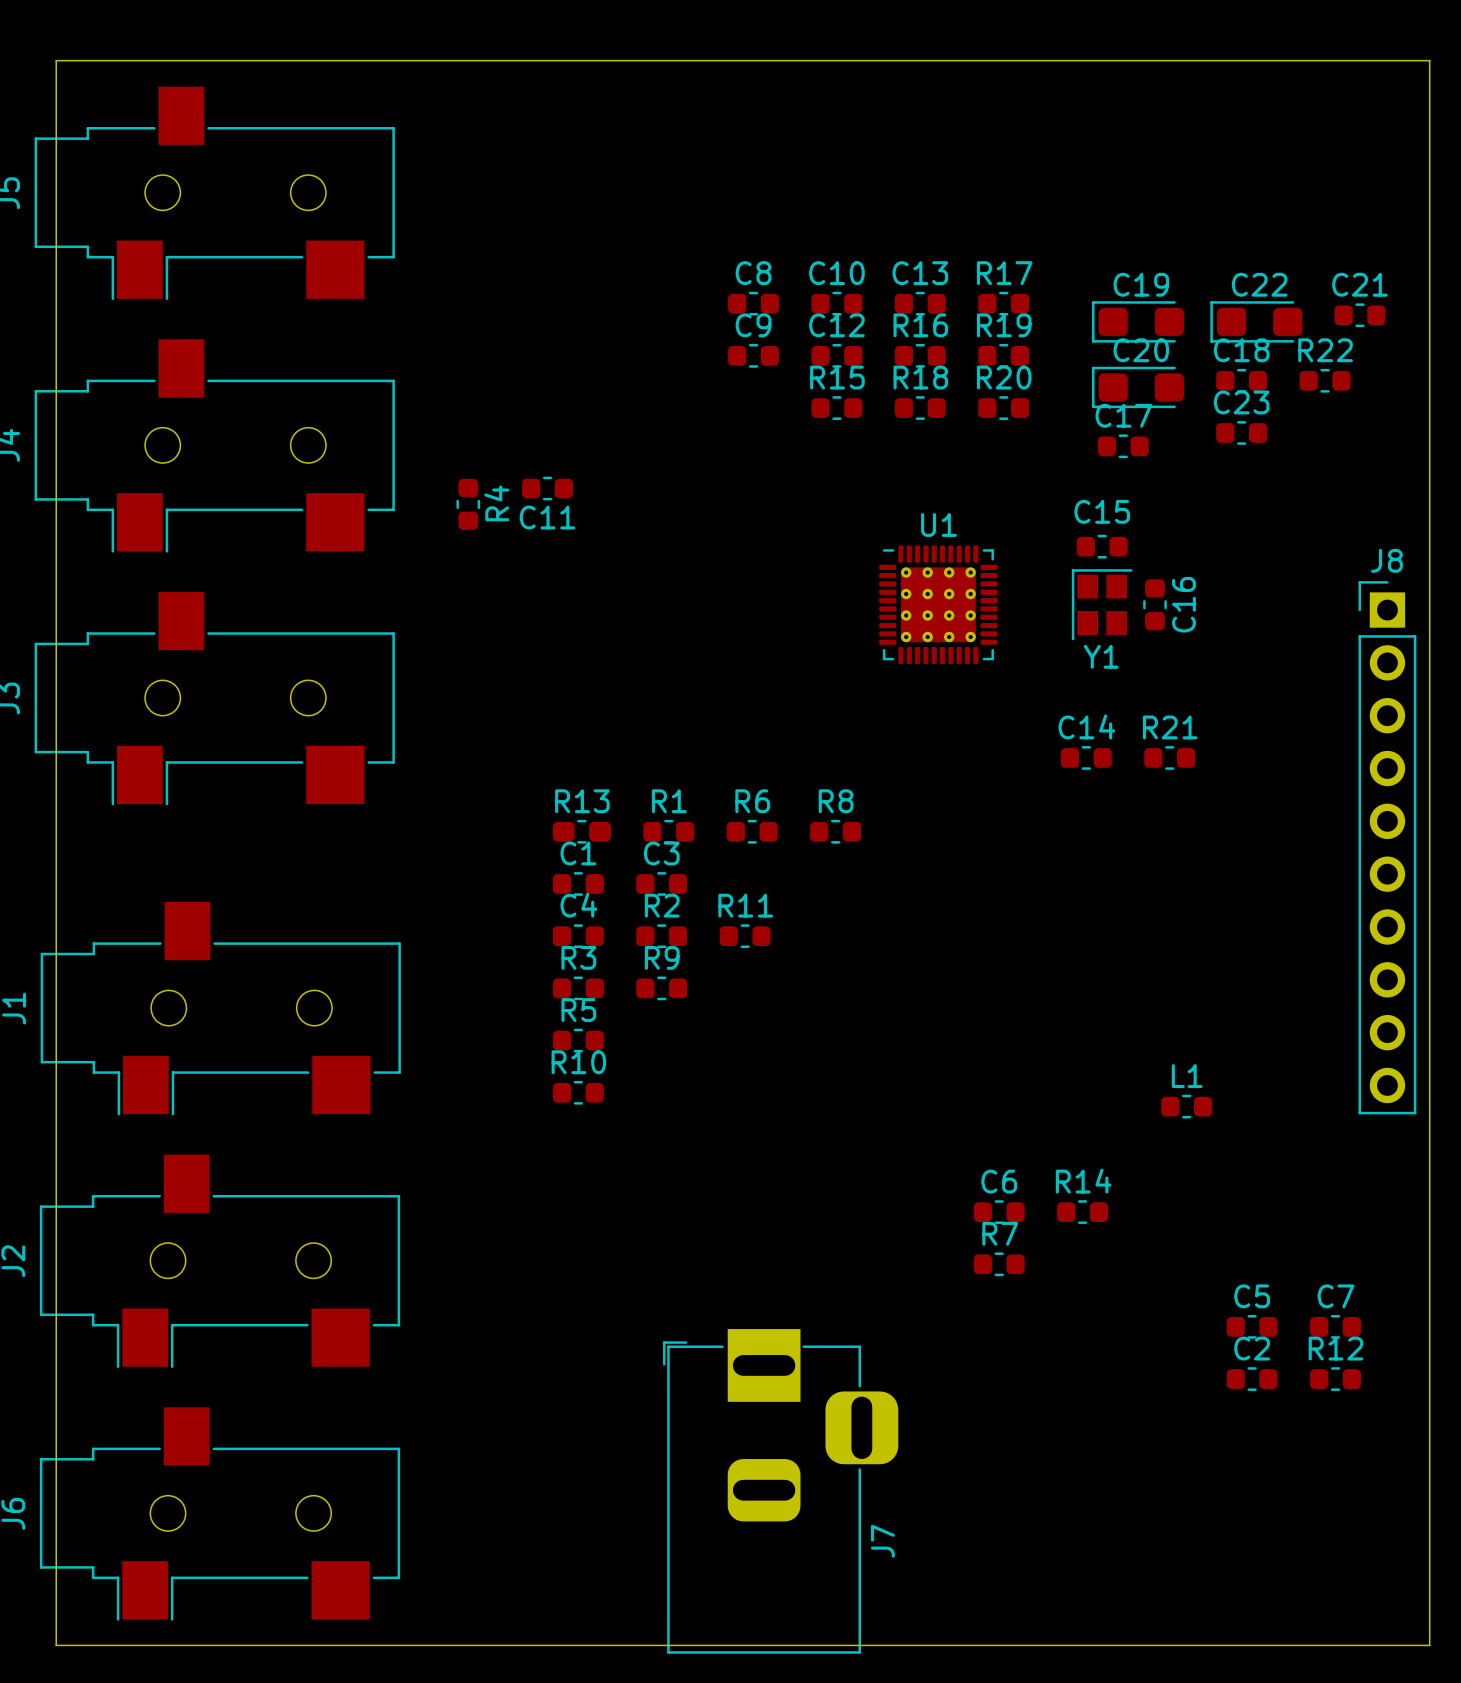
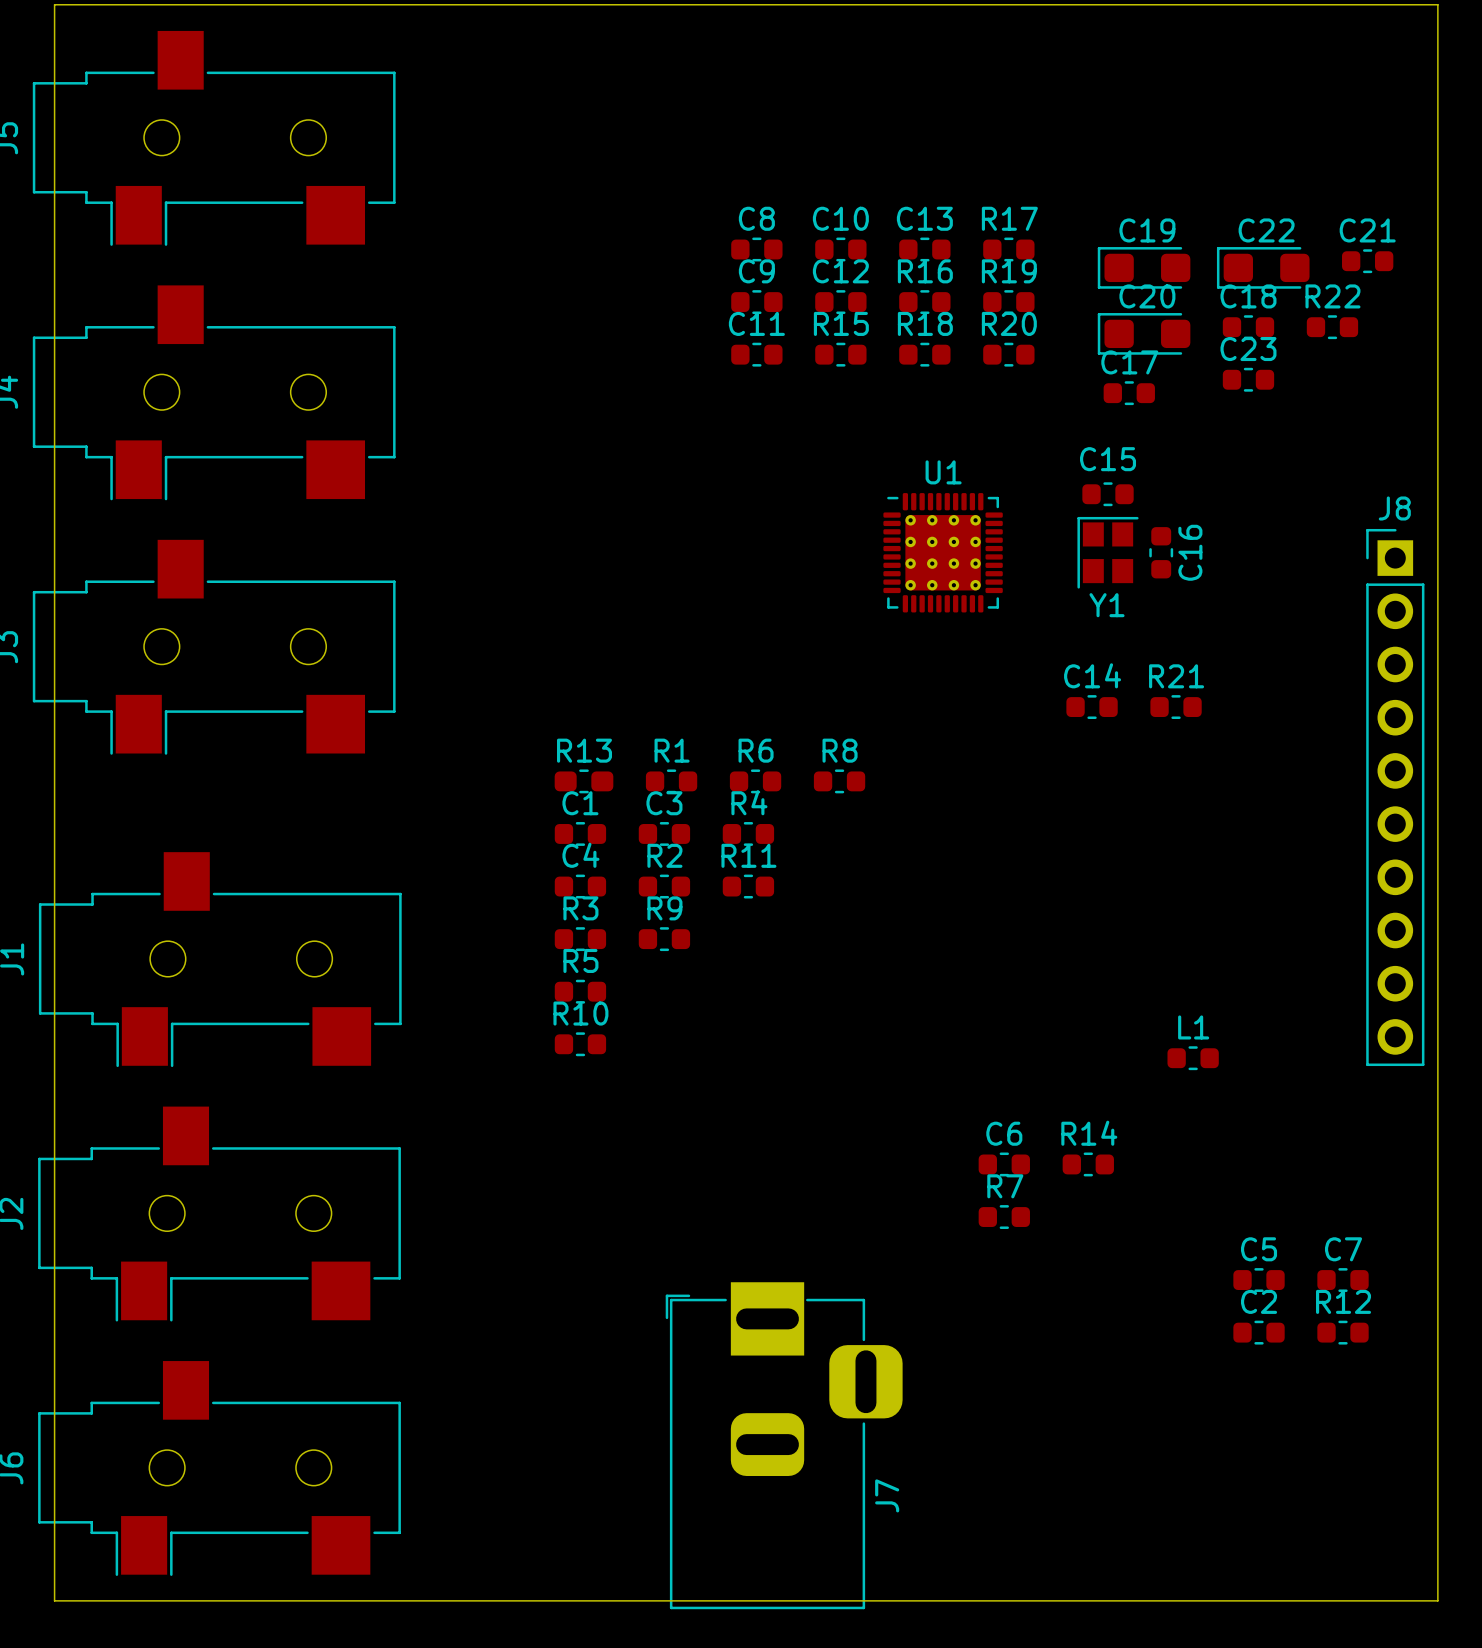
C11 position: (547, 488) -> (756, 354)
R4 name position: R4 (496, 503) -> R4 (749, 802)
R4 rotation: 0° (468, 504) -> 90° clockwise (748, 833)
R4 position: (468, 504) -> (748, 833)
C11 name position: C11 (547, 517) -> C11 (756, 323)

